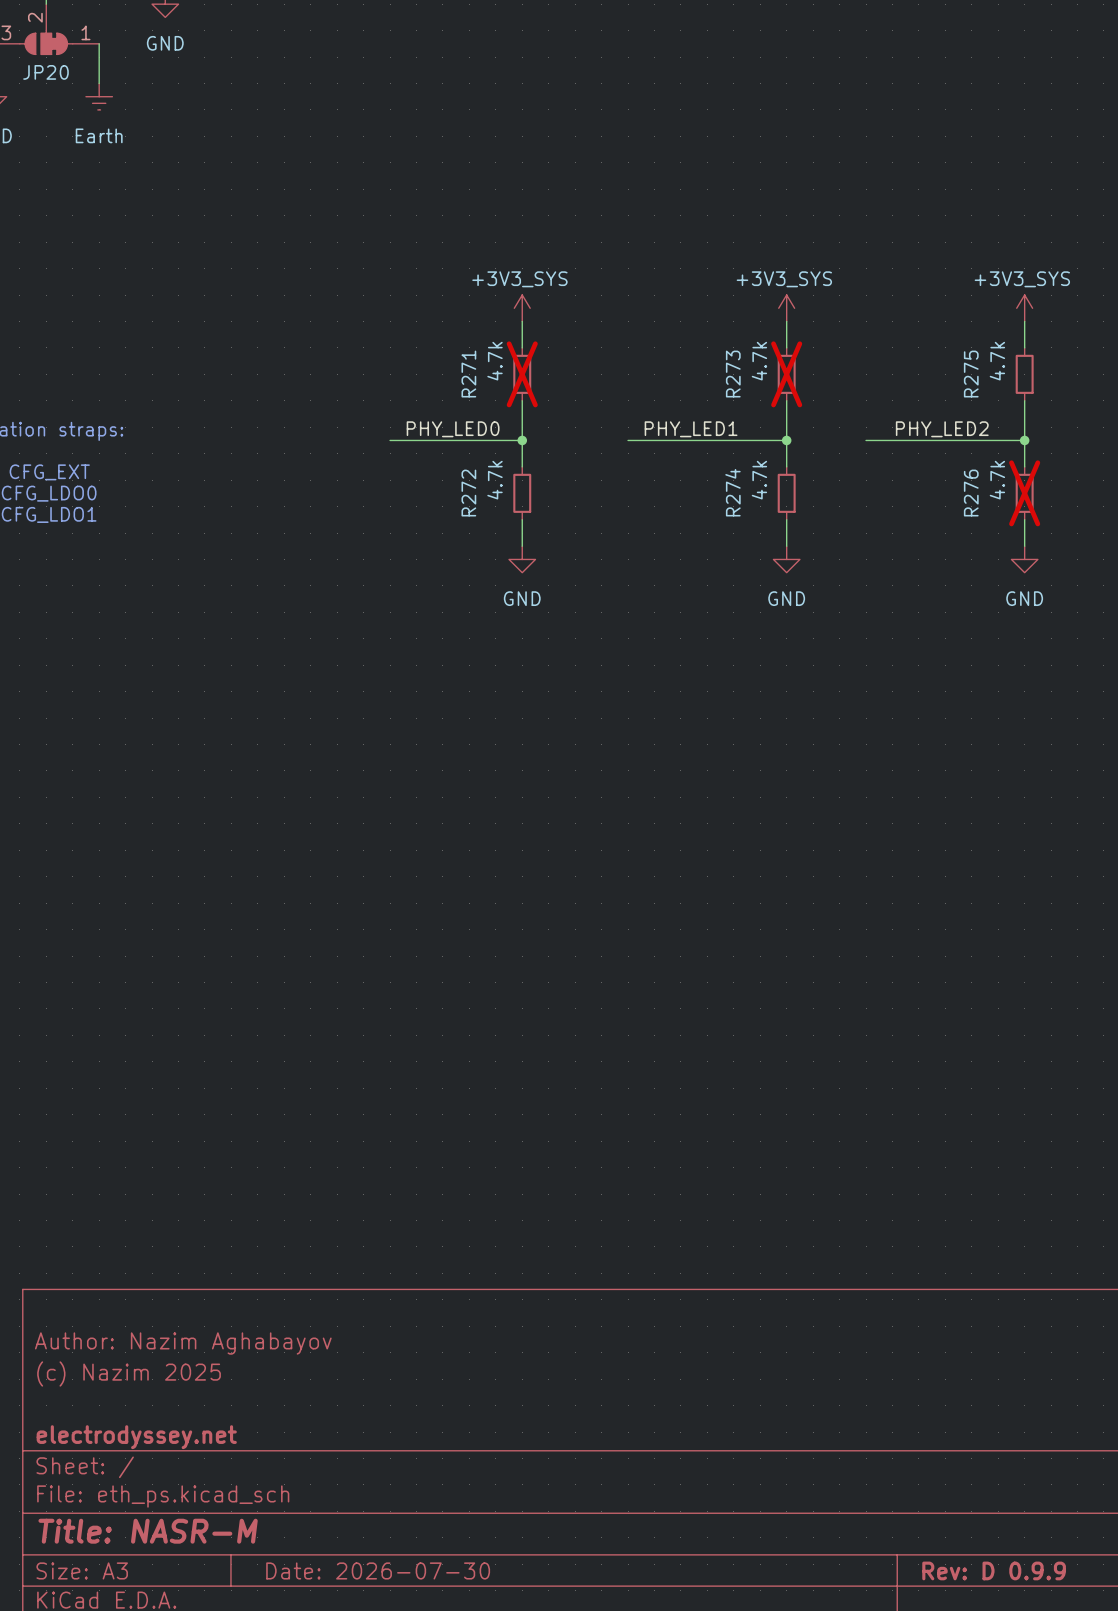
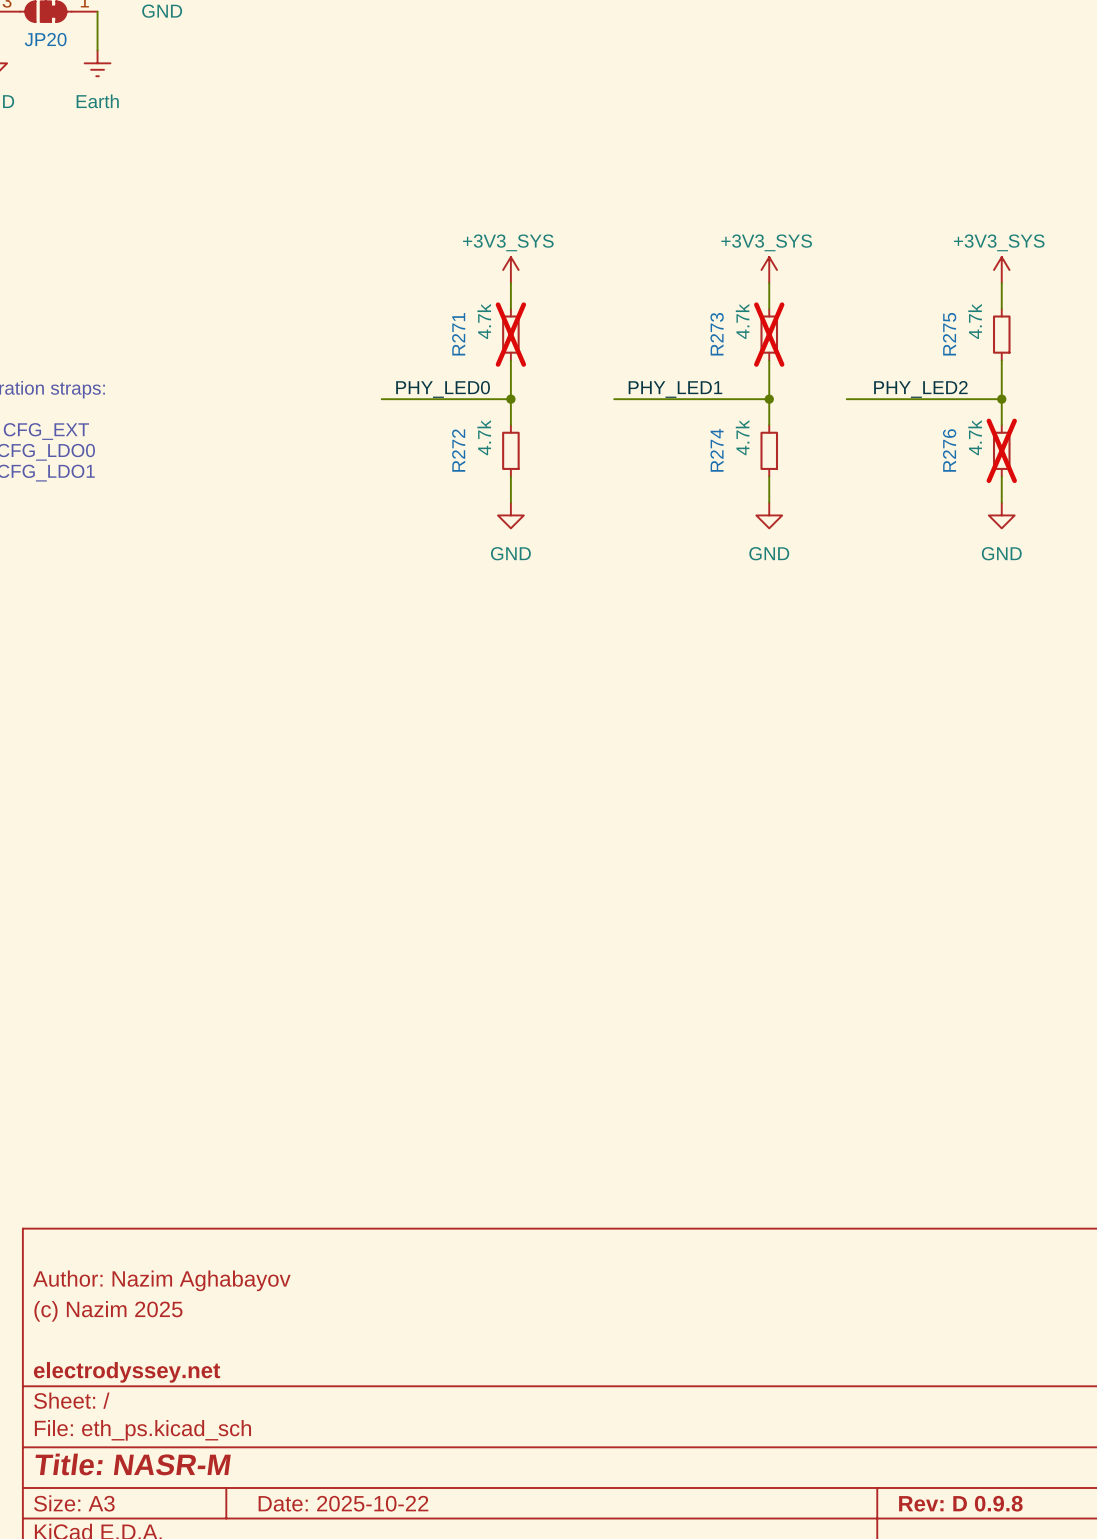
title block: Date: 2026-07-30 (378, 1570) -> Date: 2025-10-22 (343, 1503)
title block: Rev: D 0.9.9 (994, 1570) -> Rev: D 0.9.8 (960, 1503)

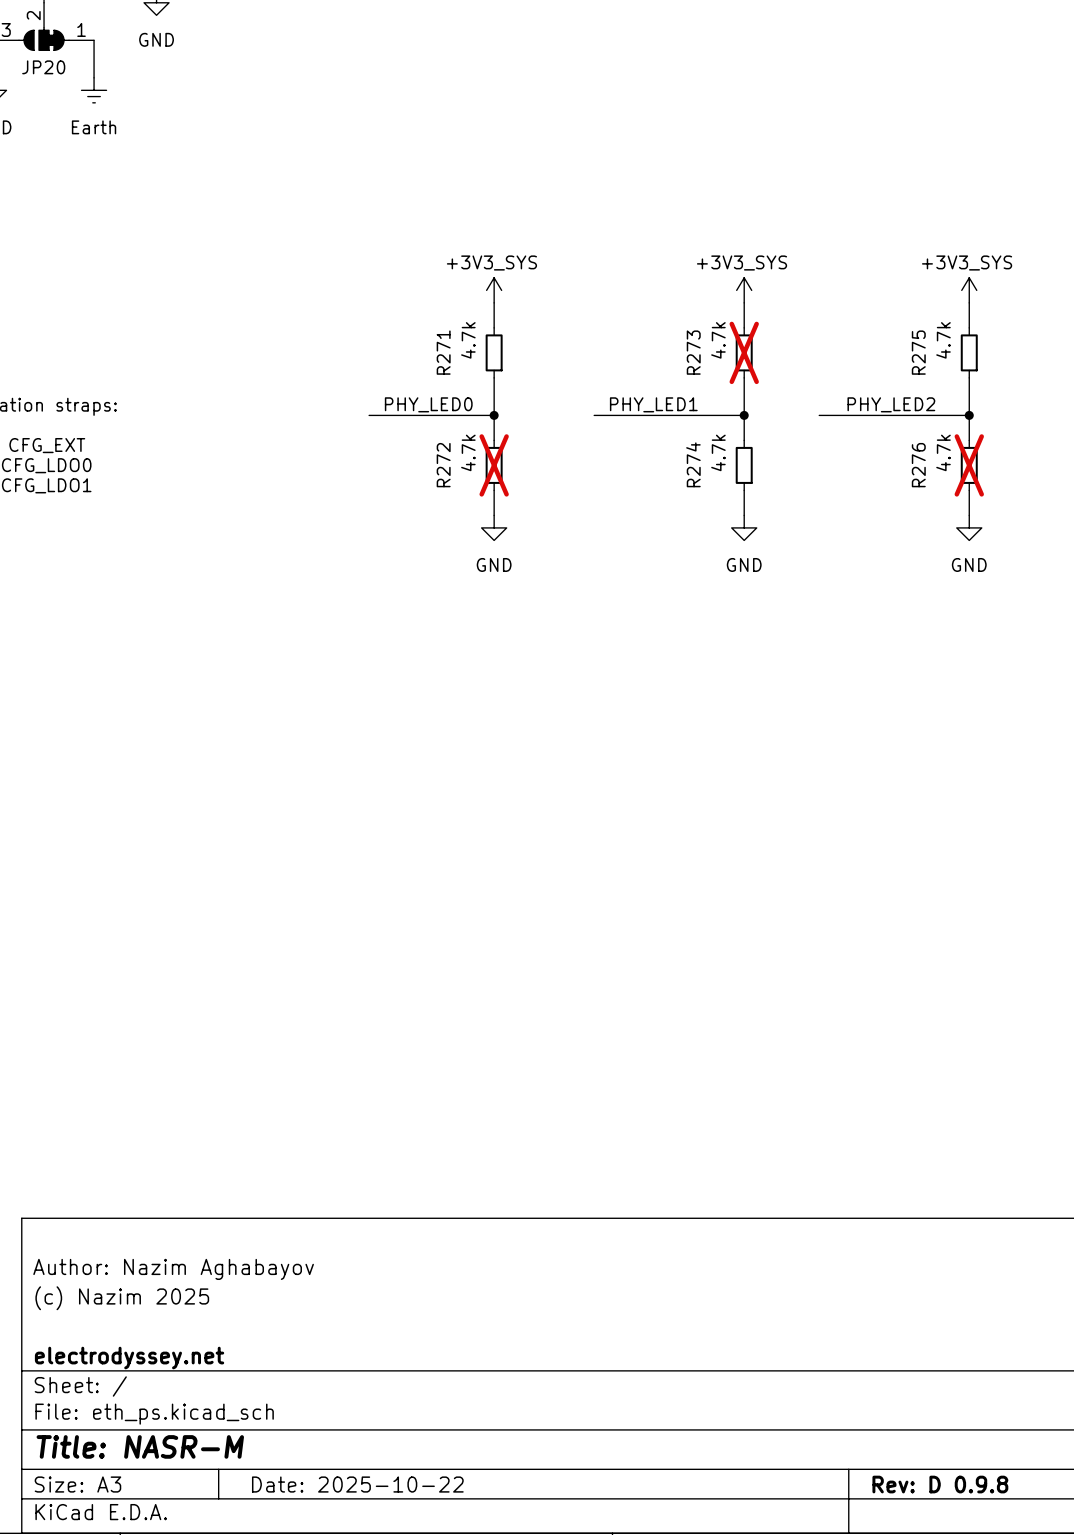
R271 do-not-place cross: (510, 334) -> none
R272 do-not-place cross: none -> (494, 465)

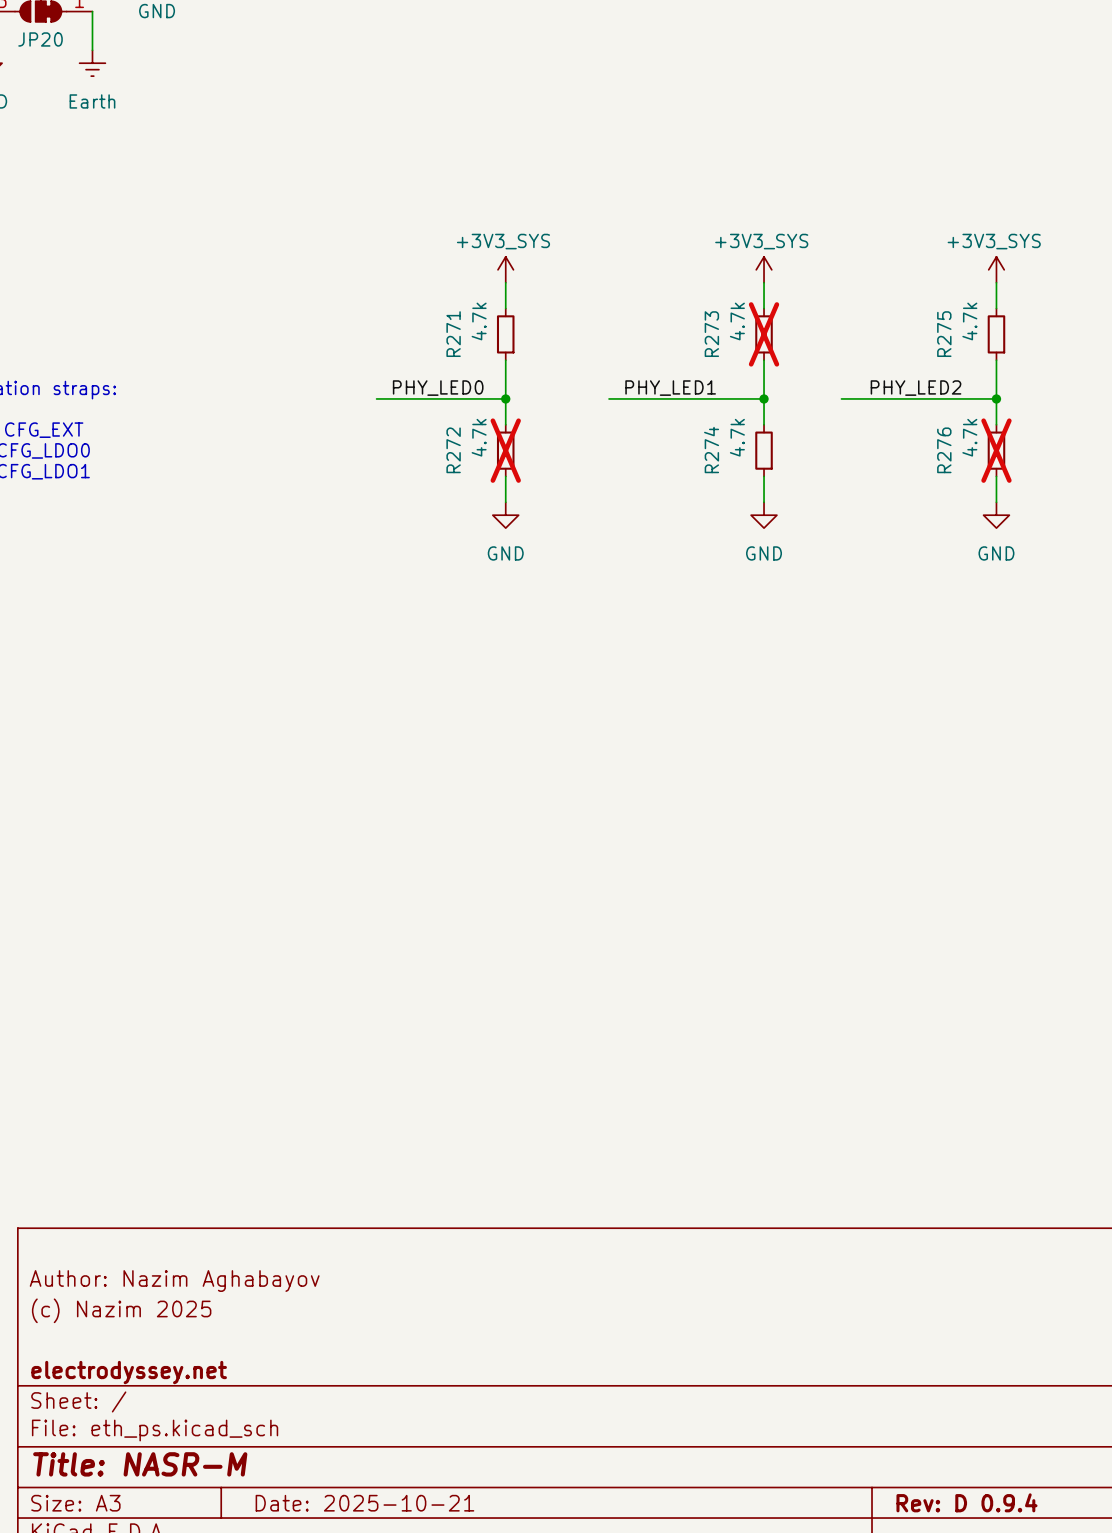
title block: Date: 2025-10-22 (357, 1484) -> Date: 2025-10-21 (364, 1503)
title block: Rev: D 0.9.8 (940, 1484) -> Rev: D 0.9.4 (966, 1502)

